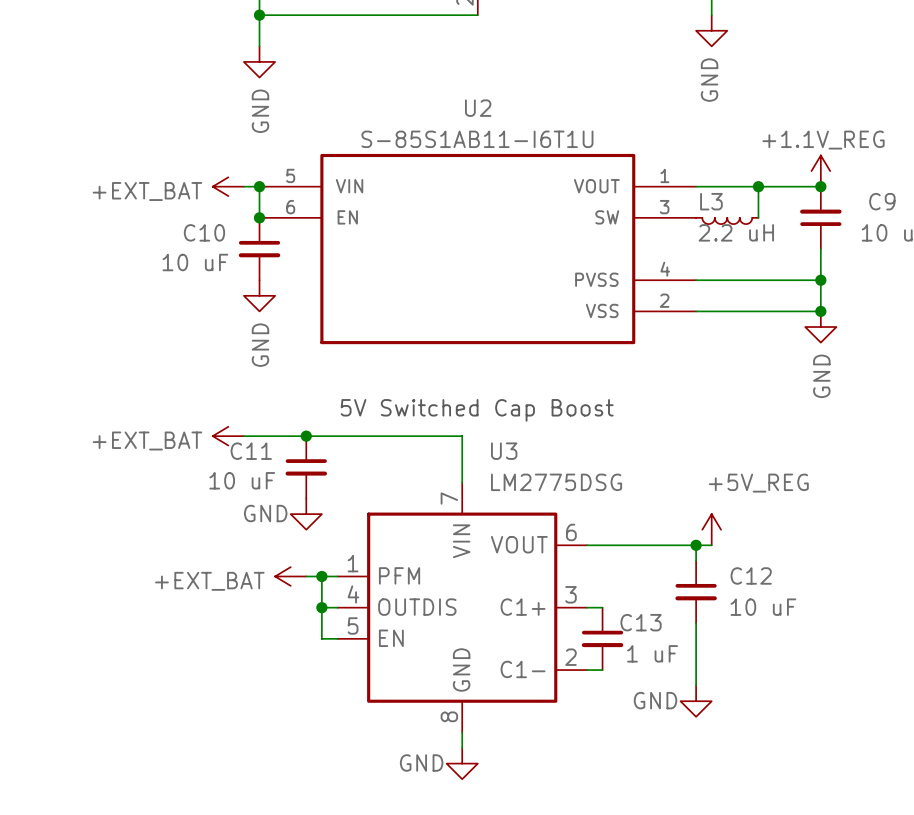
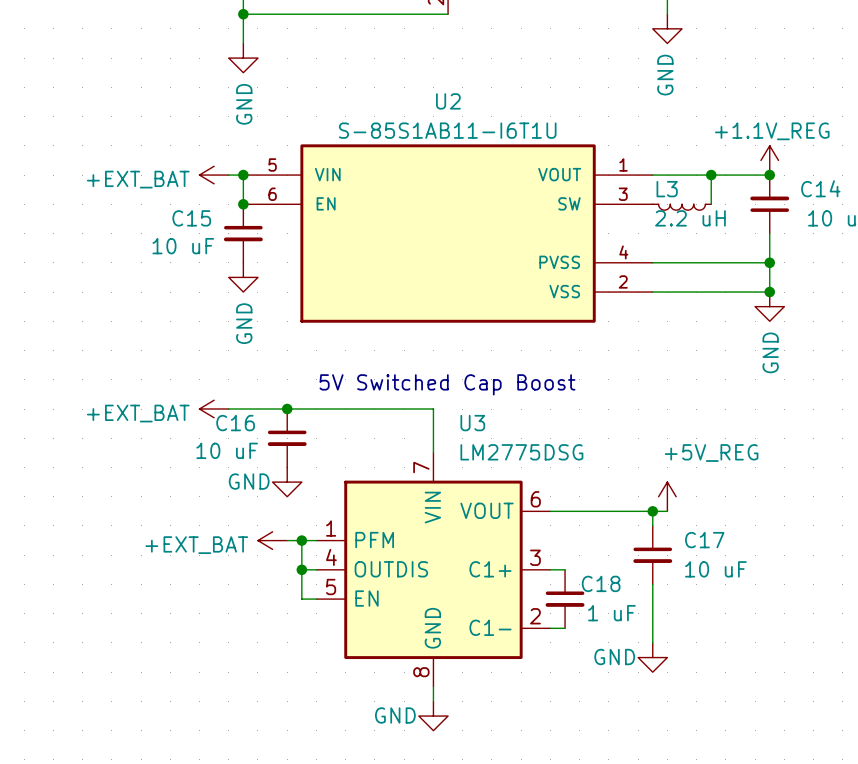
C9 name: C9 (882, 201) -> C14 (820, 188)
C10 name: C10 (204, 232) -> C15 (191, 218)
C11 name: C11 (251, 451) -> C16 (235, 423)
C12 name: C12 (751, 575) -> C17 (704, 540)
C13 name: C13 (641, 622) -> C18 (601, 583)

